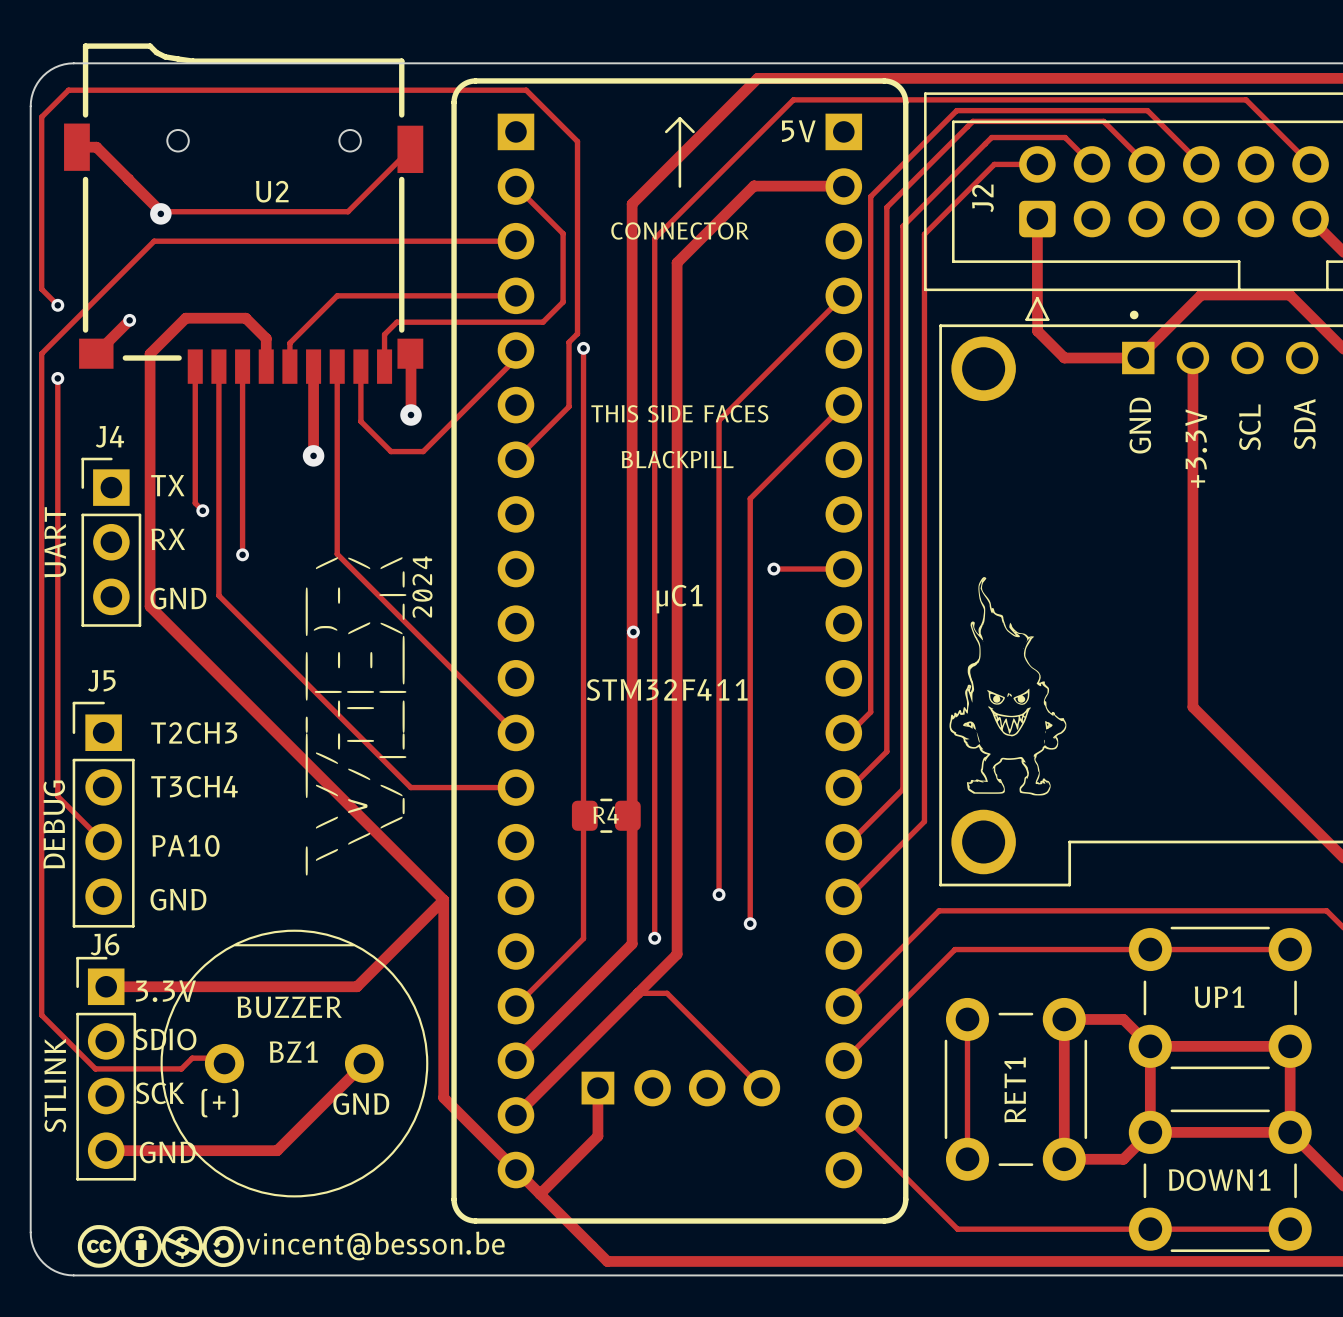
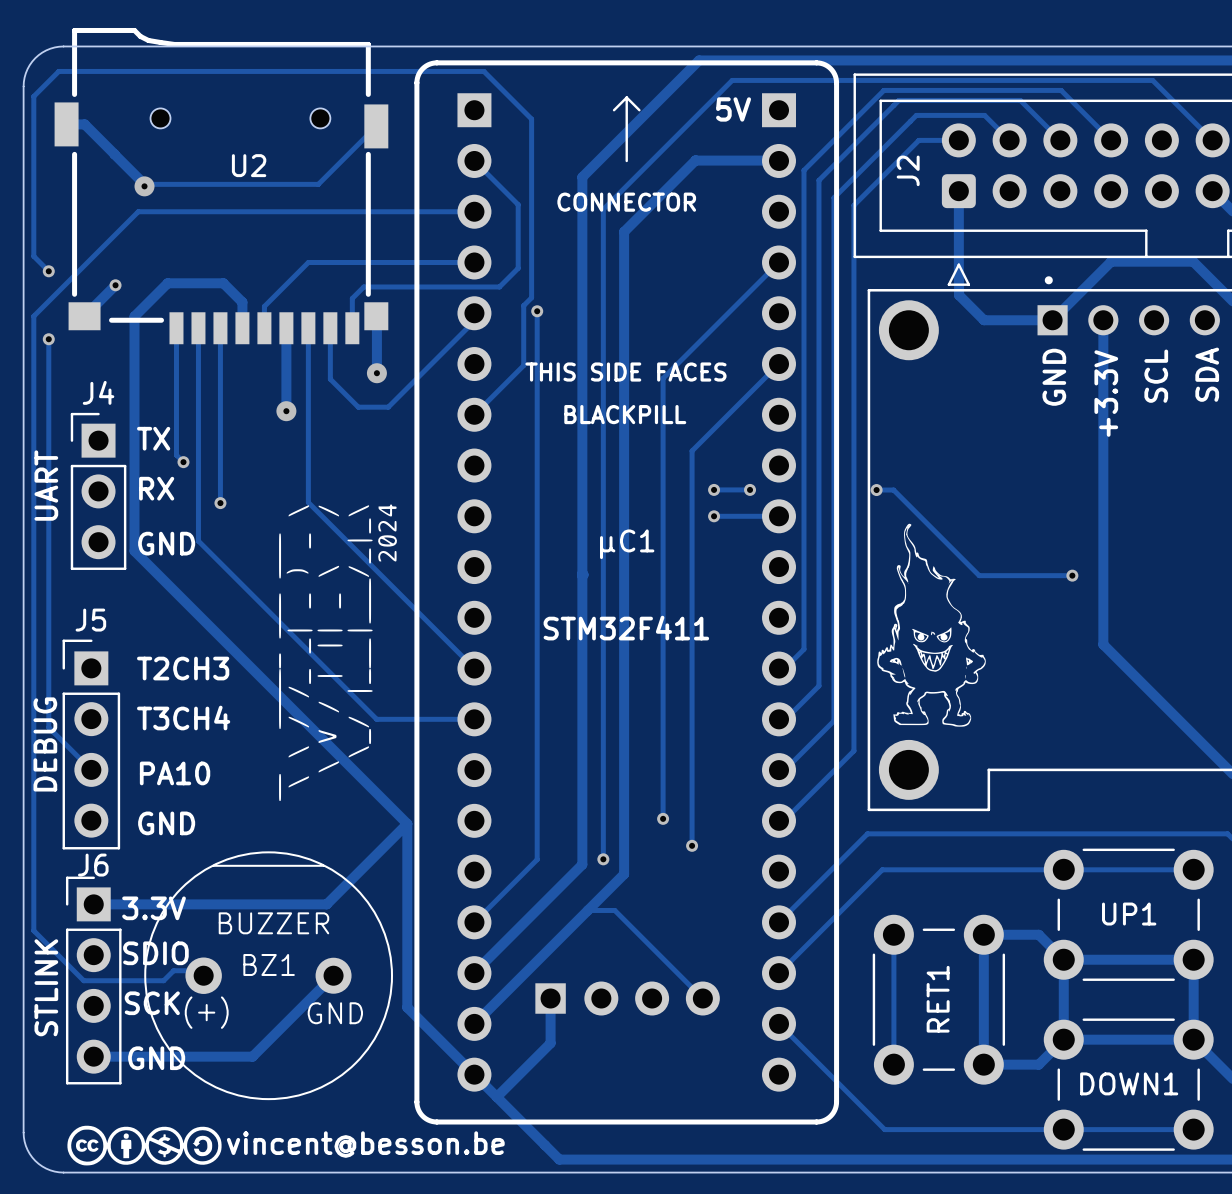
track: none -> (714, 489) (750, 489)
via: none -> (714, 489)
via: none -> (750, 489)
track: none -> (876, 490) (893, 490) (979, 575) (1072, 575)
via: none -> (876, 490)
via: (633, 632) -> none
via: none -> (1072, 575)
R4: (606, 815) -> none

